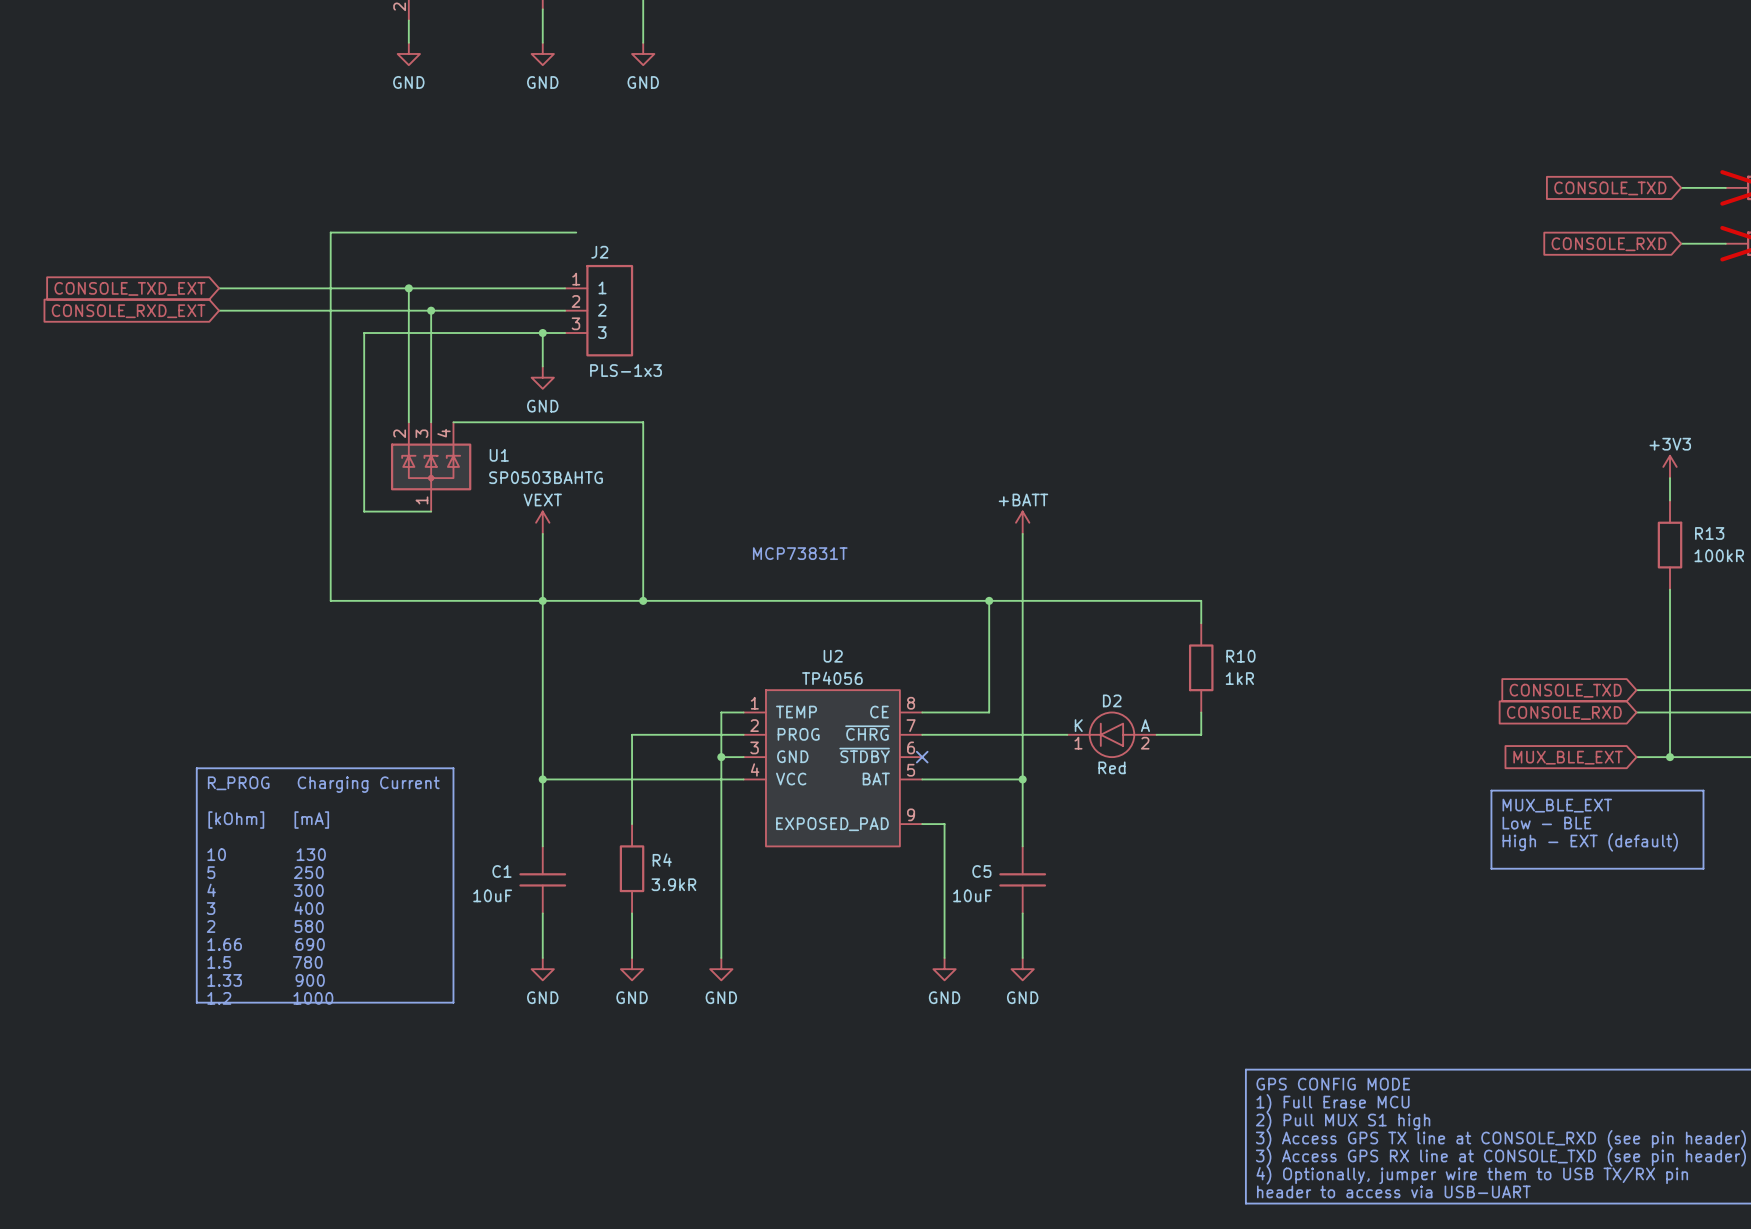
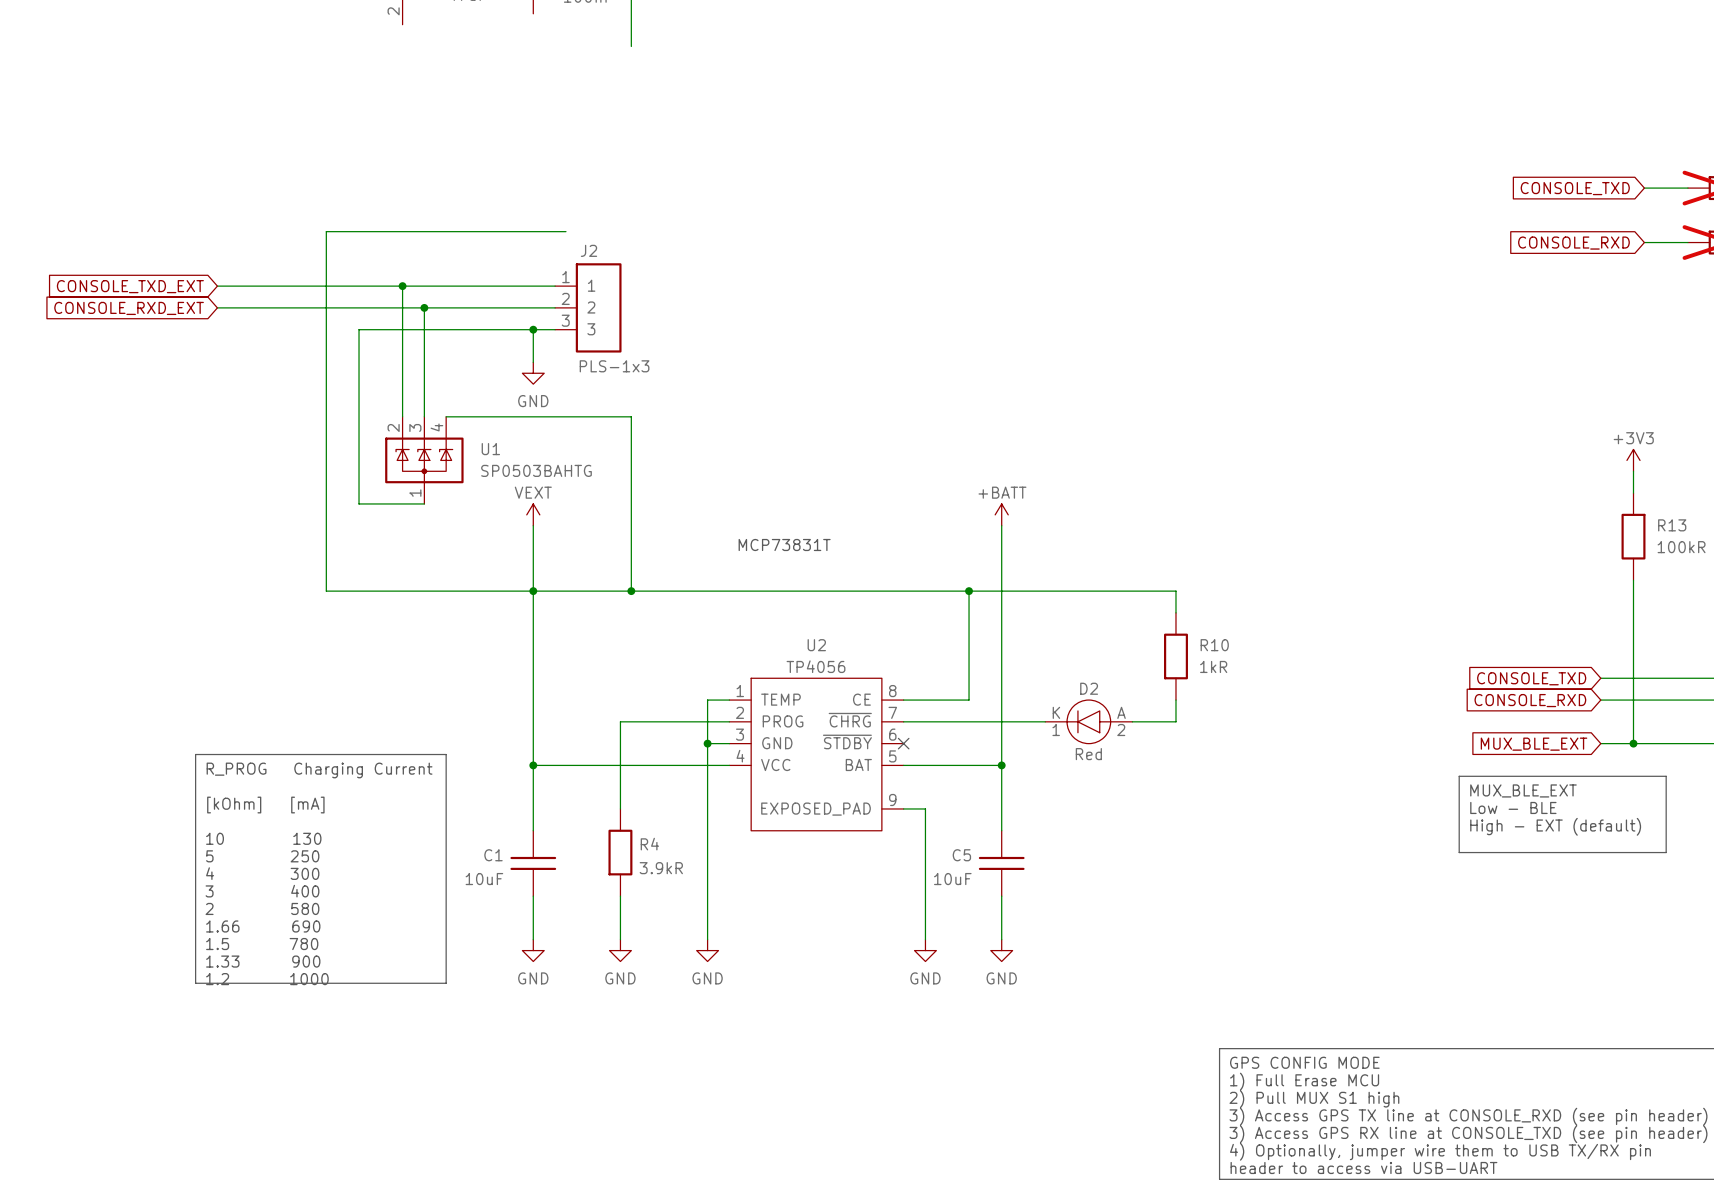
wire: (542, 9) (542, 42) -> none
wire: (408, 20) (408, 42) -> none
power symbol: GND (408, 53) -> none
power symbol: GND (542, 53) -> none
power symbol: GND (643, 53) -> none

